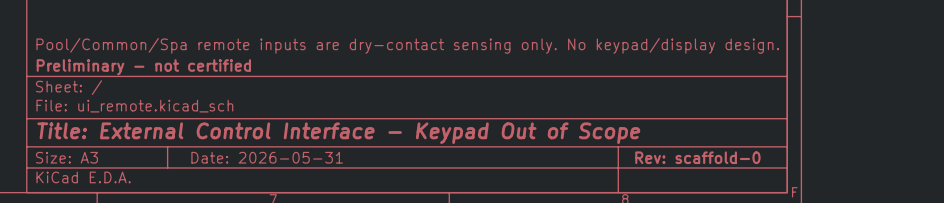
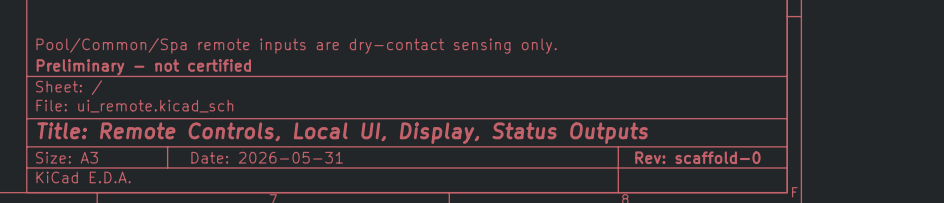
title block: Pool/Common/Spa remote inputs are dry-contact sensing only. No keypad/display design. (407, 45) -> Pool/Common/Spa remote inputs are dry-contact sensing only. (296, 45)
title block: Title: External Control Interface - Keypad Out of Scope (338, 133) -> Title: Remote Controls, Local UI, Display, Status Outputs (342, 133)

